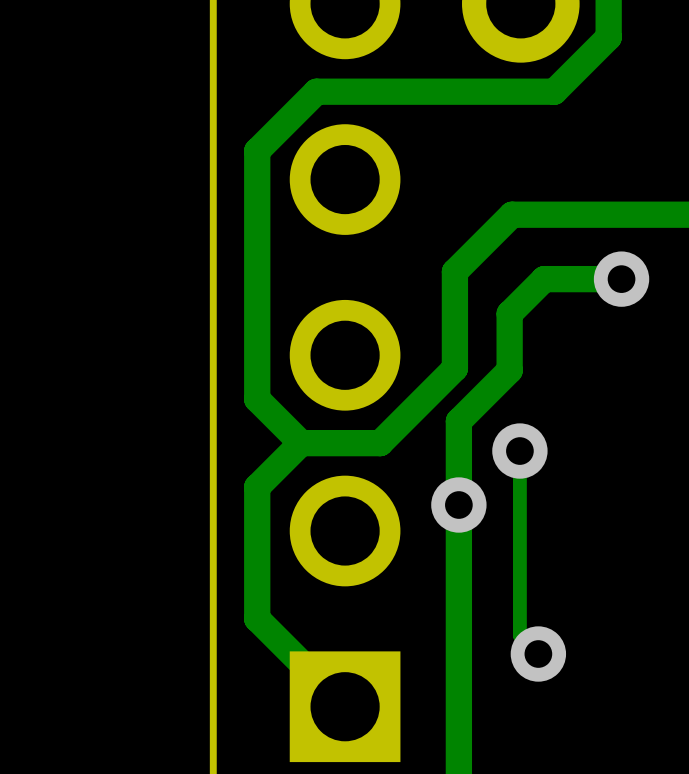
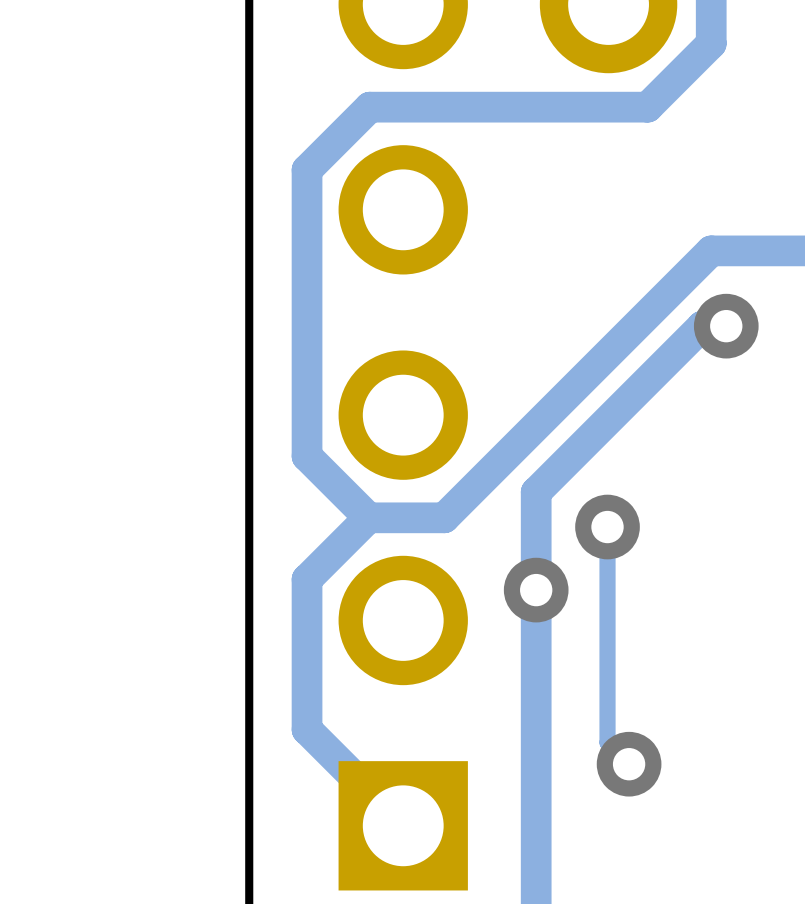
track: (262, 145) (257, 151) (257, 399) (301, 443) -> (307, 169) (307, 456) (368, 517) (307, 579) (307, 729)
track: (608, 214) (512, 214) (454, 271) (454, 368) -> none
track: (600, 279) (544, 279) -> (711, 250) (635, 326)
track: none -> (702, 326) (536, 492)
track: (509, 313) (509, 370) (458, 421) -> (595, 366) (531, 430)
track: (301, 443) (257, 487) (257, 618) (262, 624) -> none

